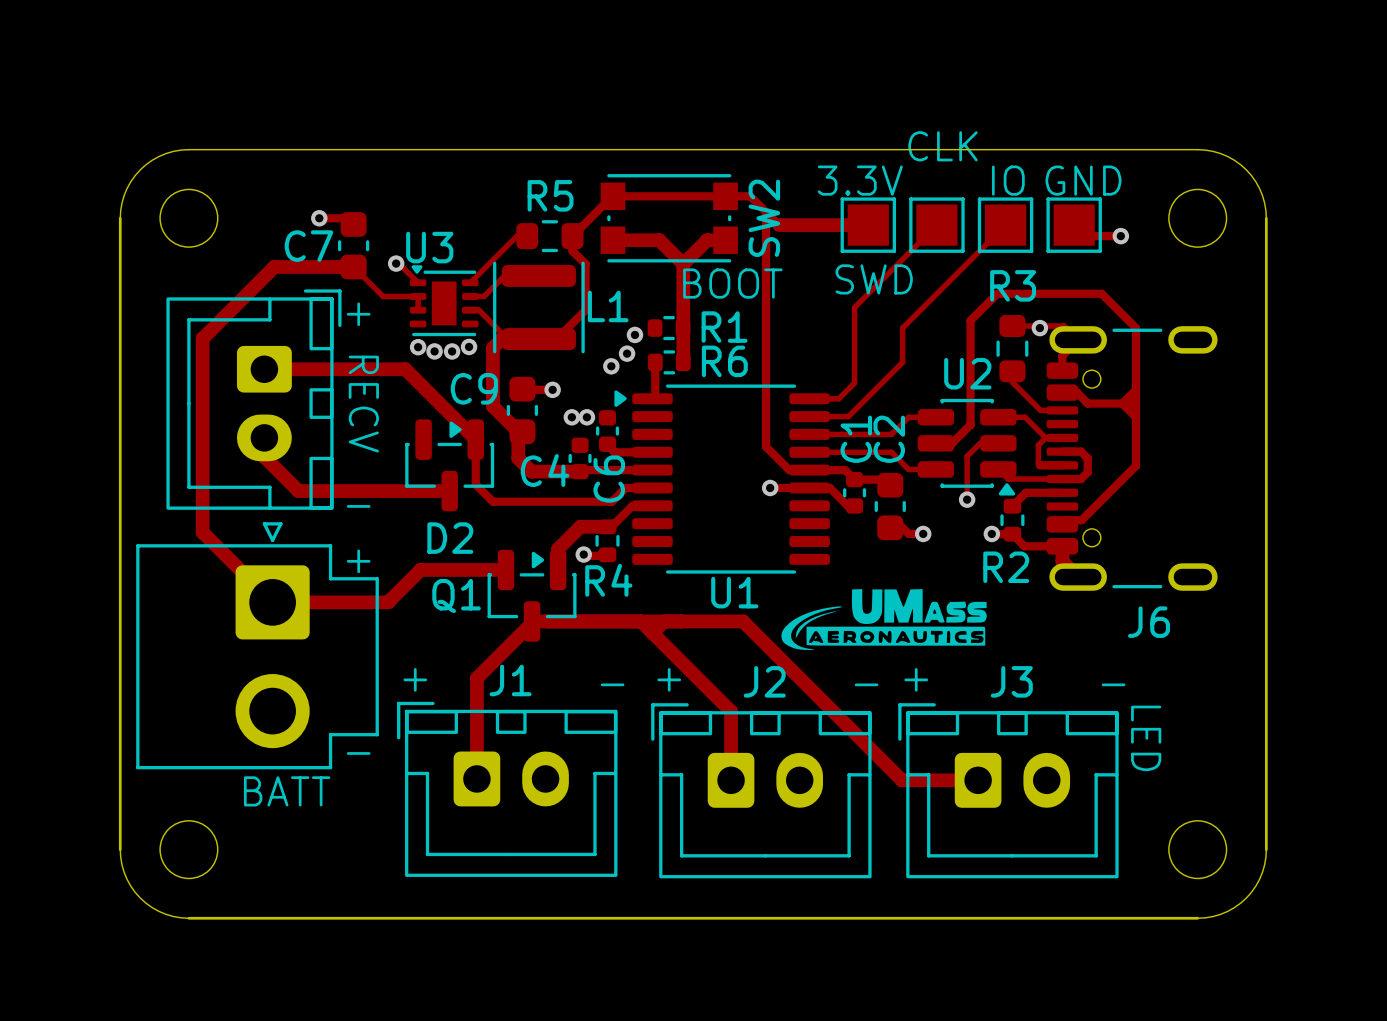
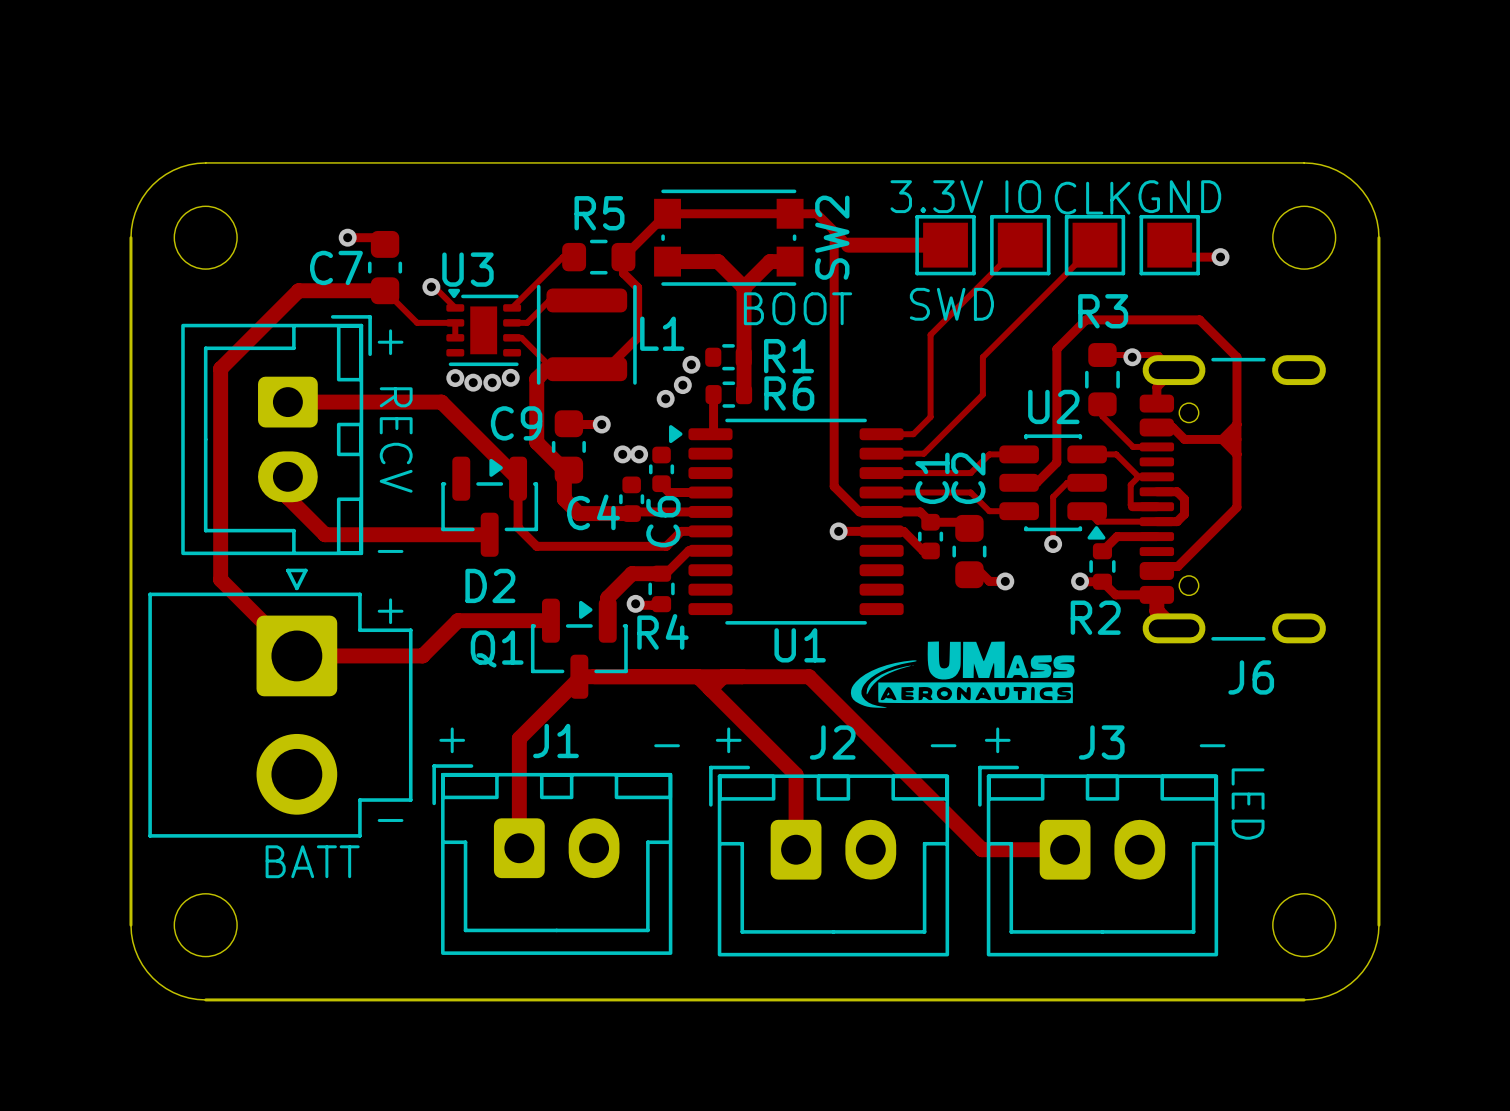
text position: CLK (942, 146) -> CLK (1092, 198)
text position: IO (1008, 180) -> IO (1023, 196)

